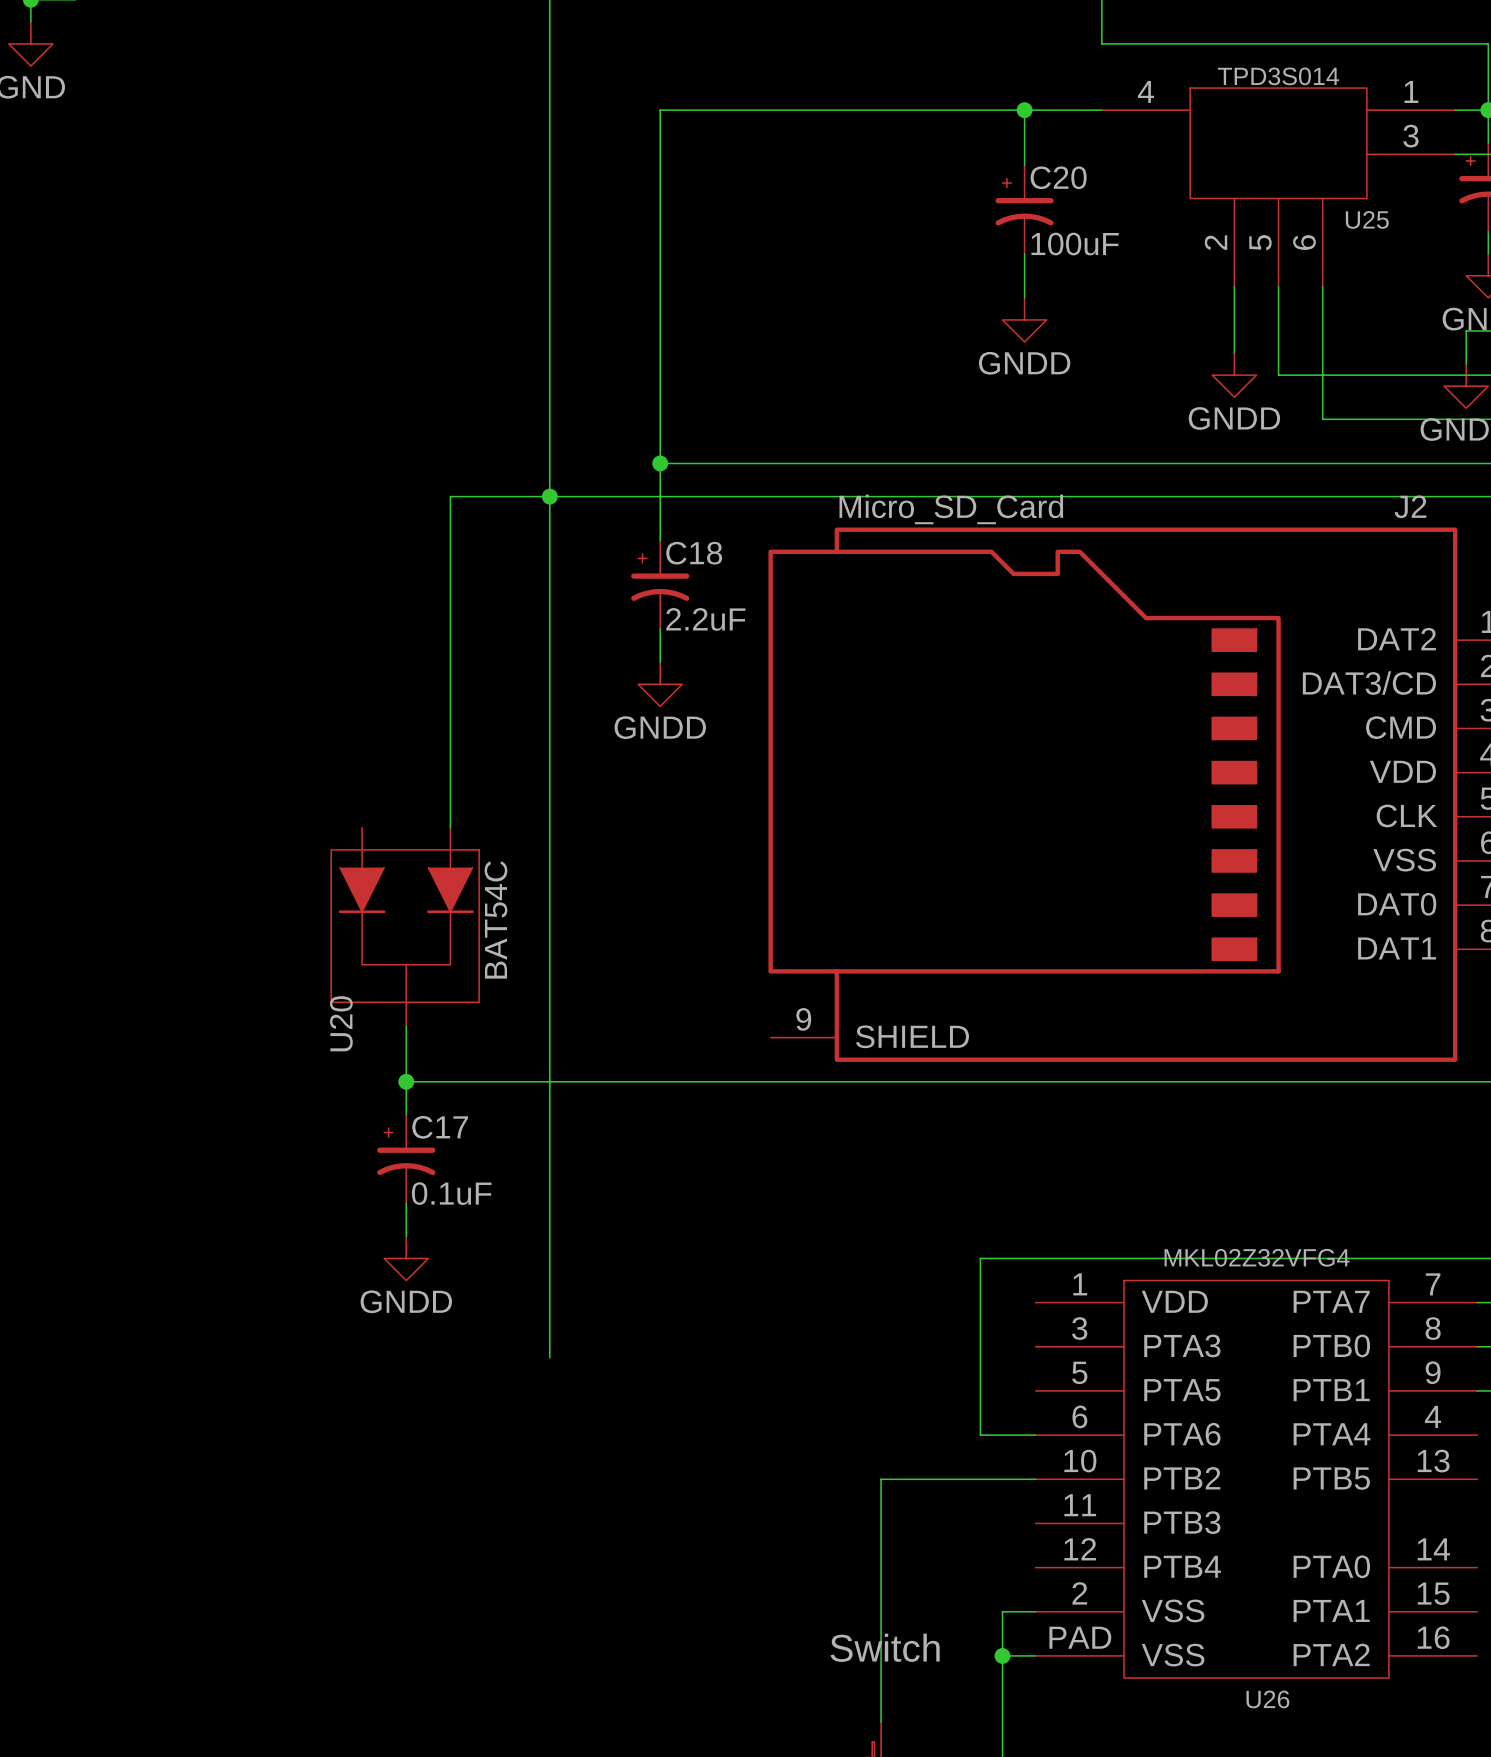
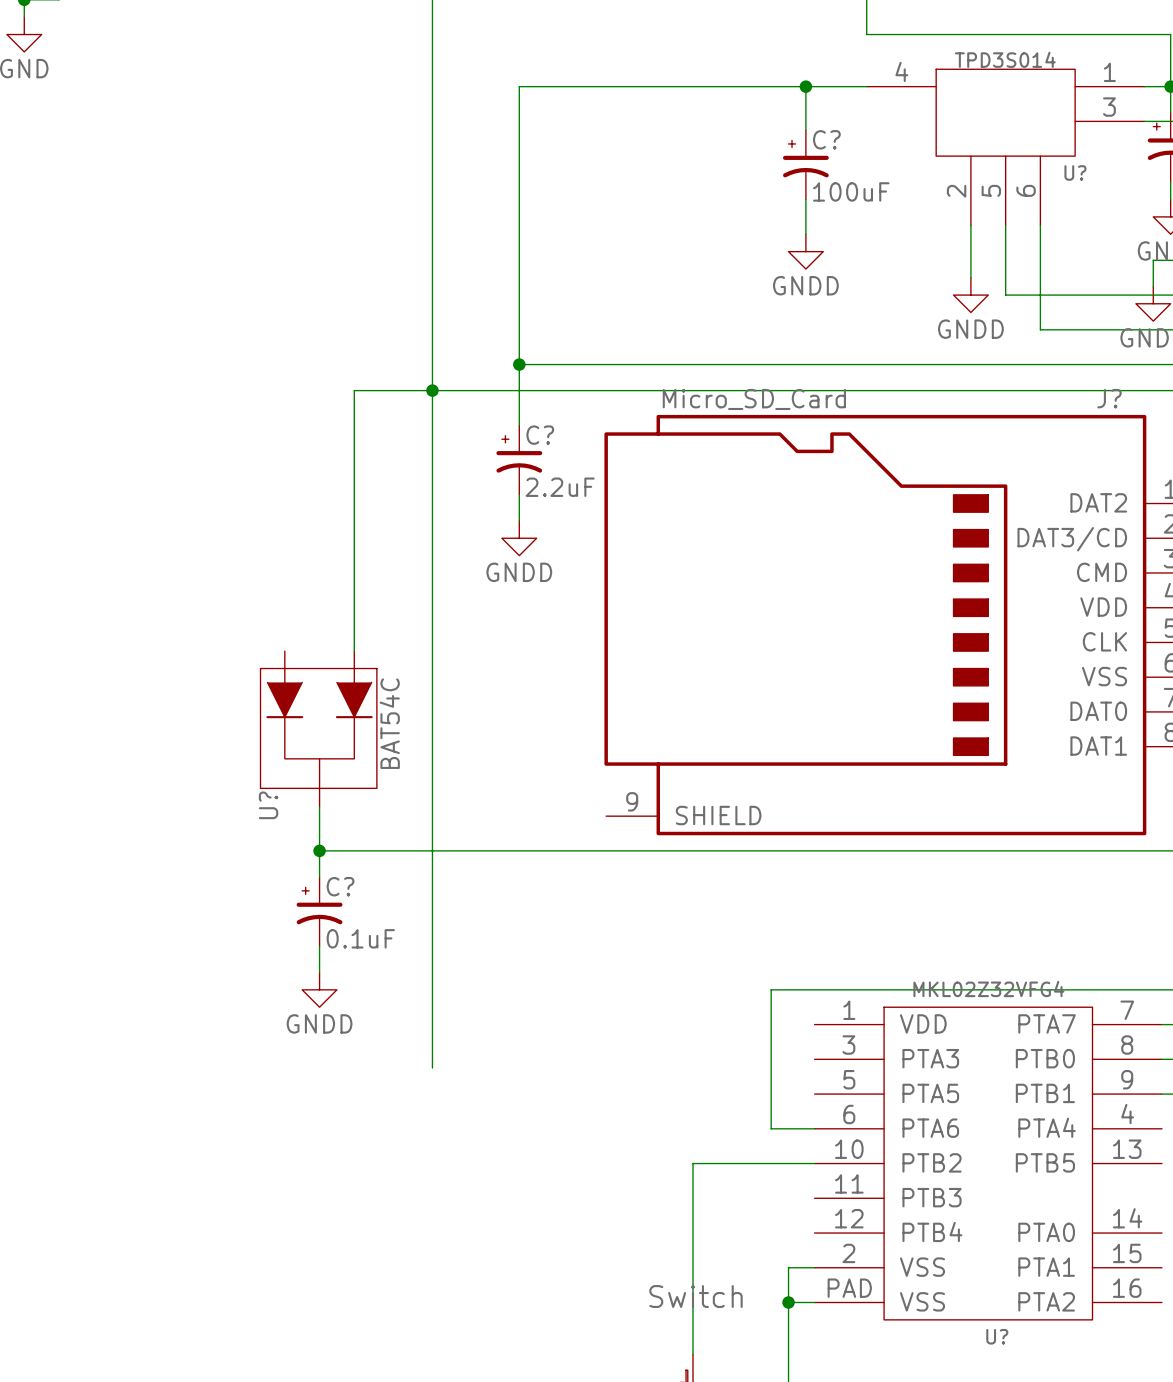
C20 name: C20 (1058, 177) -> C? (826, 139)
U25 name: U25 (1367, 219) -> U? (1075, 172)
J2 name: J2 (1410, 506) -> J? (1109, 398)
C18 name: C18 (694, 553) -> C? (540, 435)
U20 name: U20 (341, 1023) -> U? (268, 805)
C17 name: C17 (440, 1127) -> C? (340, 886)
U26 name: U26 (1267, 1699) -> U? (997, 1336)

